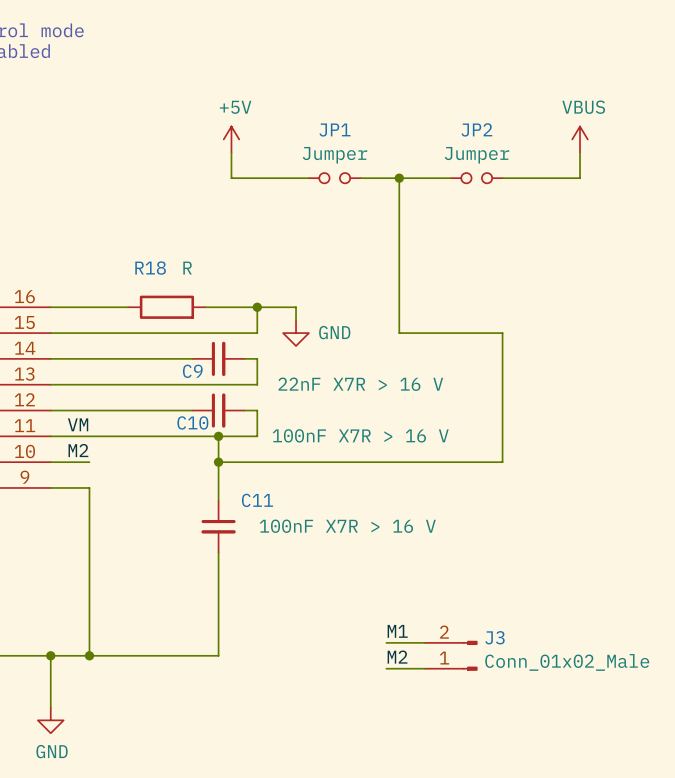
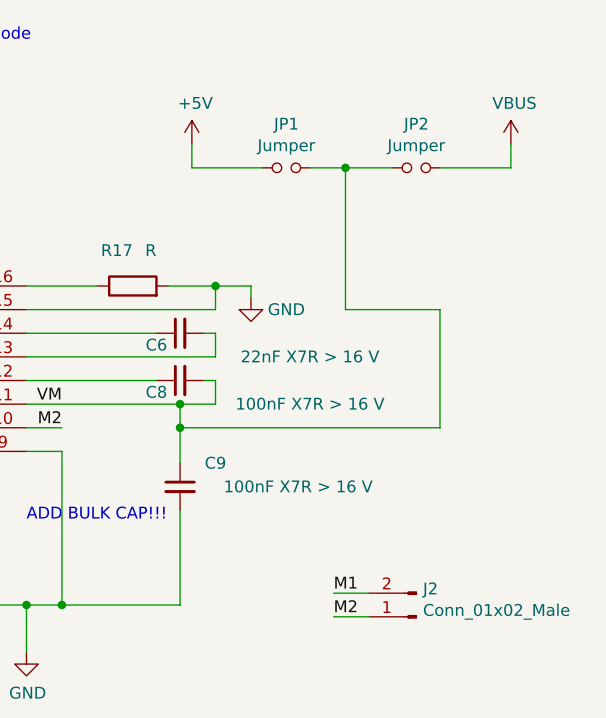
R18 name: R18 (150, 268) -> R17 (116, 250)
C9 name: C9 (192, 371) -> C6 (156, 344)
C10 name: C10 (192, 422) -> C8 (156, 391)
C11 name: C11 (257, 500) -> C9 (215, 462)
text: none -> ADD BULK CAP!!! (95, 512)
J3 name: J3 (495, 637) -> J2 (429, 589)

